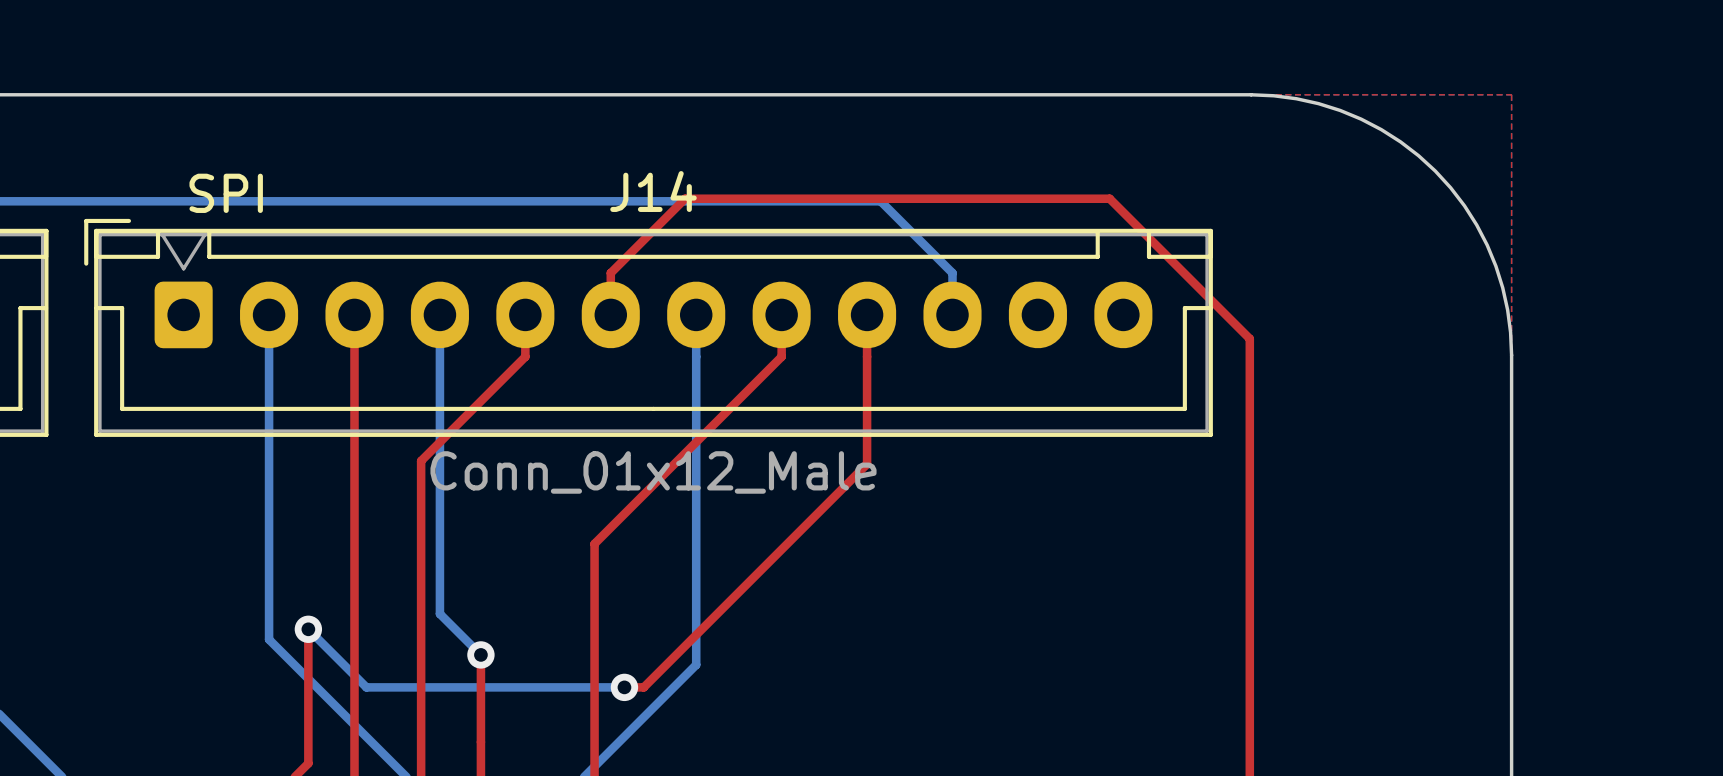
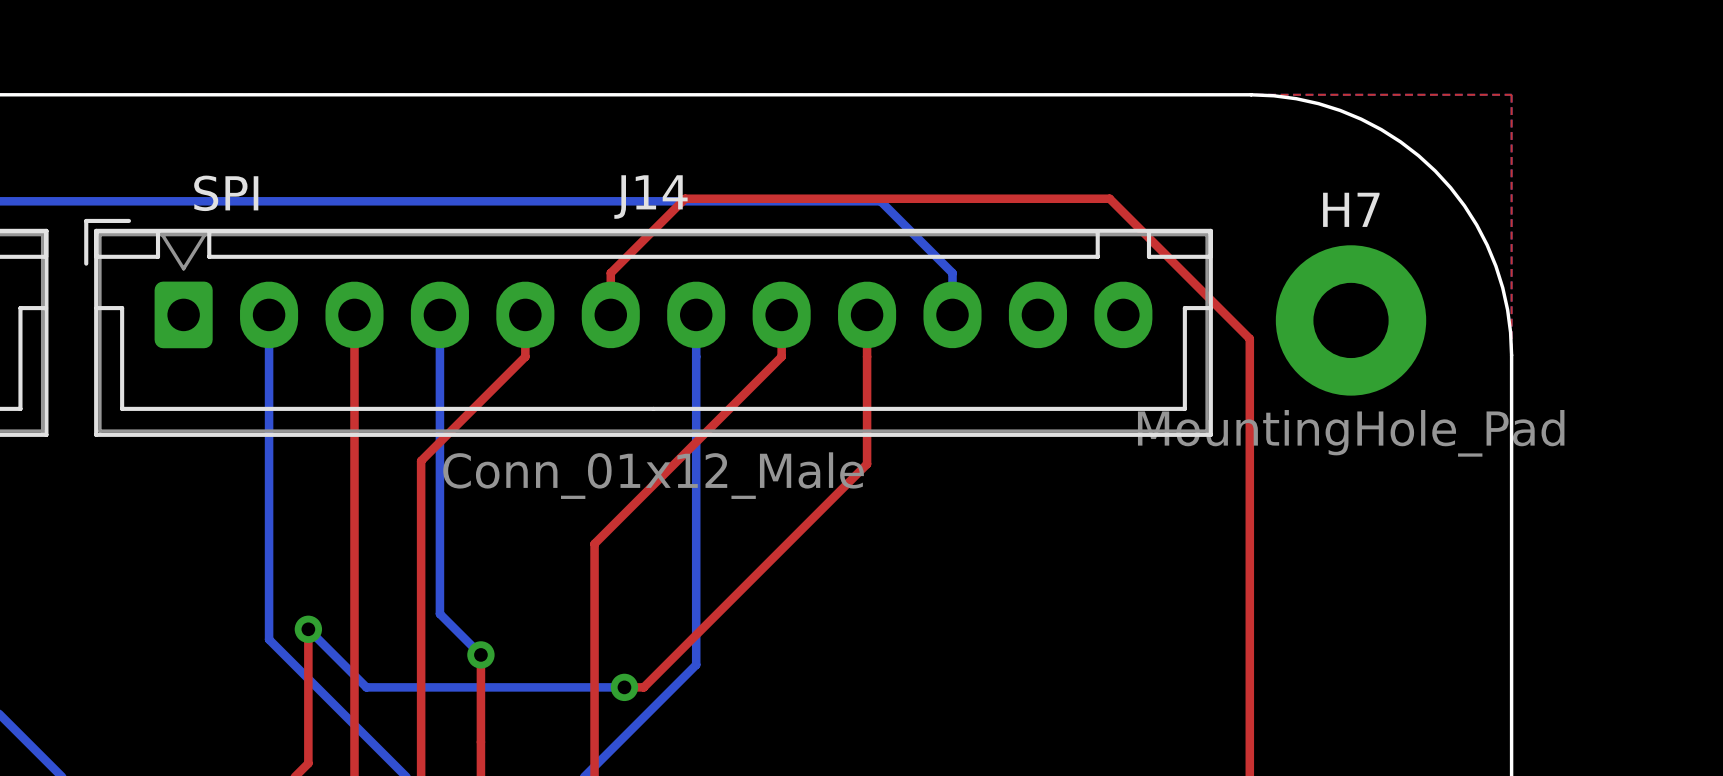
H7: none -> MountingHole_Pad (1351, 320)

